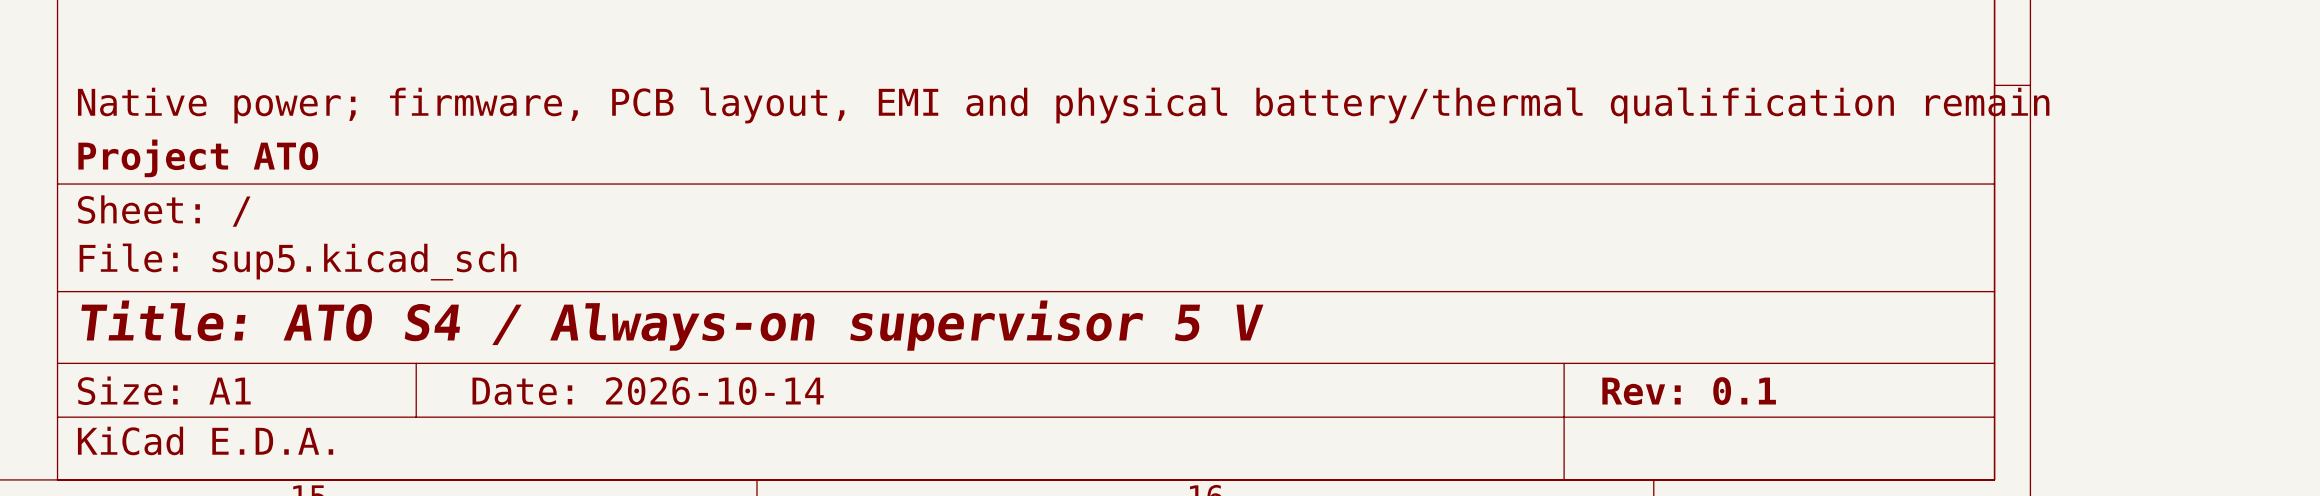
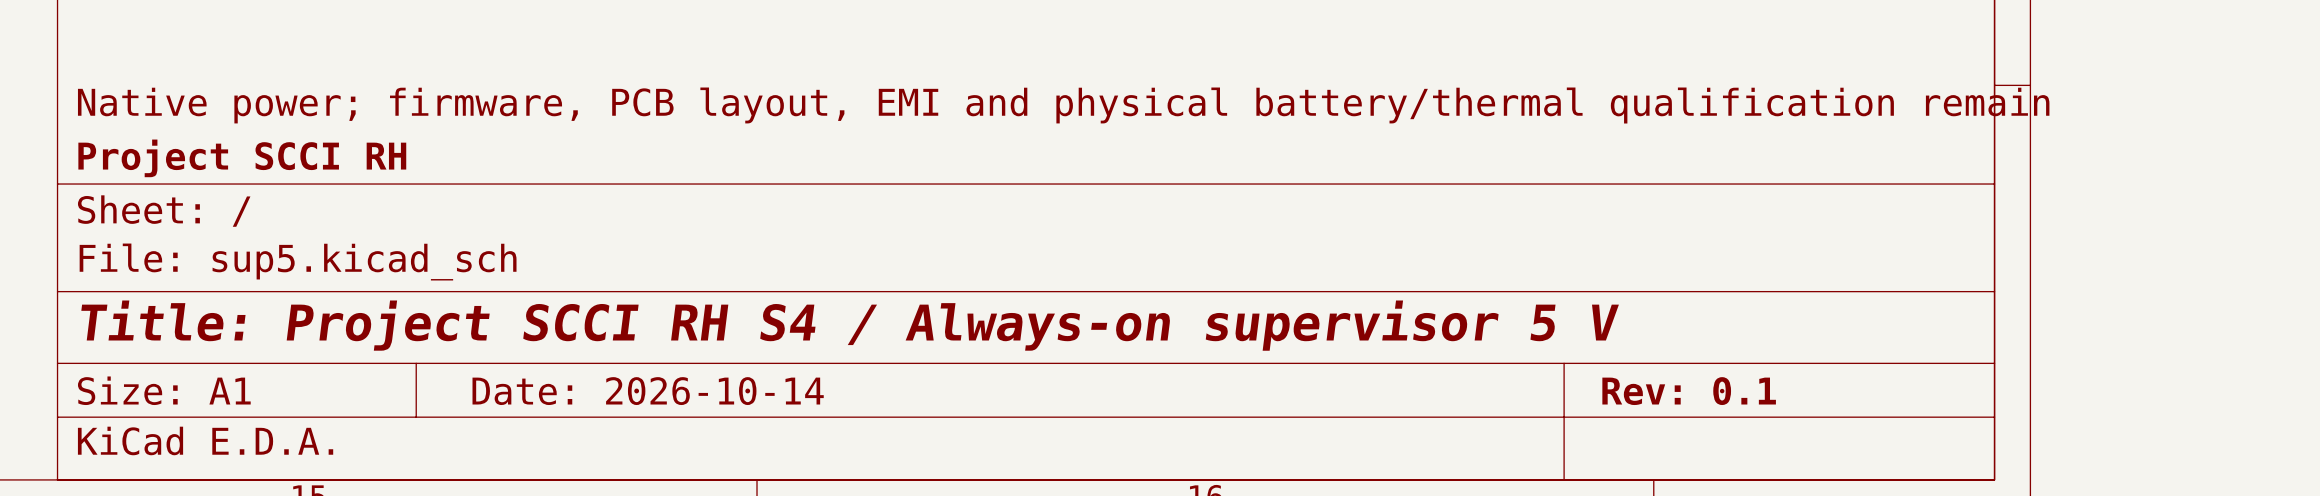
title block: Project ATO (198, 158) -> Project SCCI RH (242, 158)
title block: Title: ATO S4 / Always-on supervisor 5 V (672, 325) -> Title: Project SCCI RH S4 / Always-on supervisor 5 V (850, 325)

